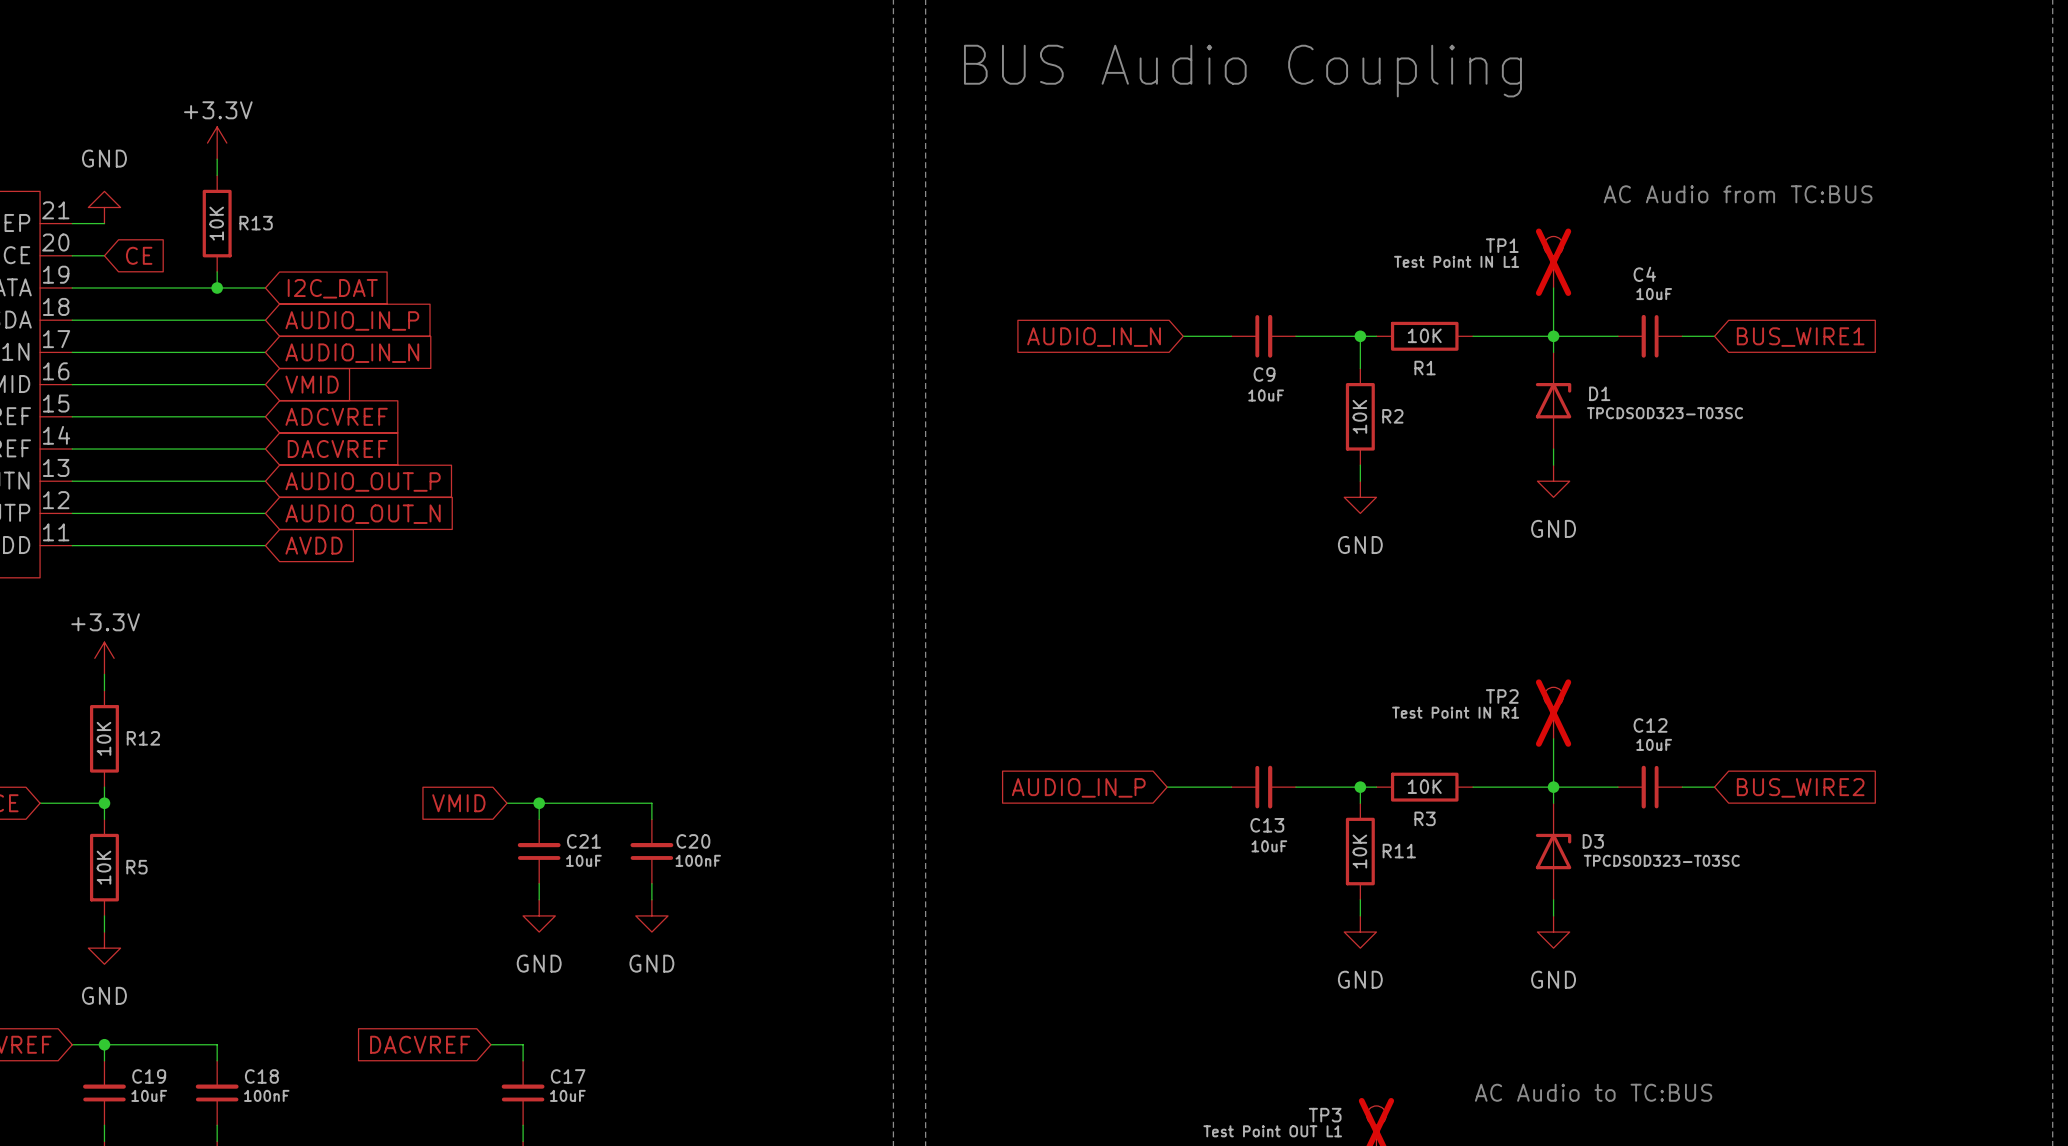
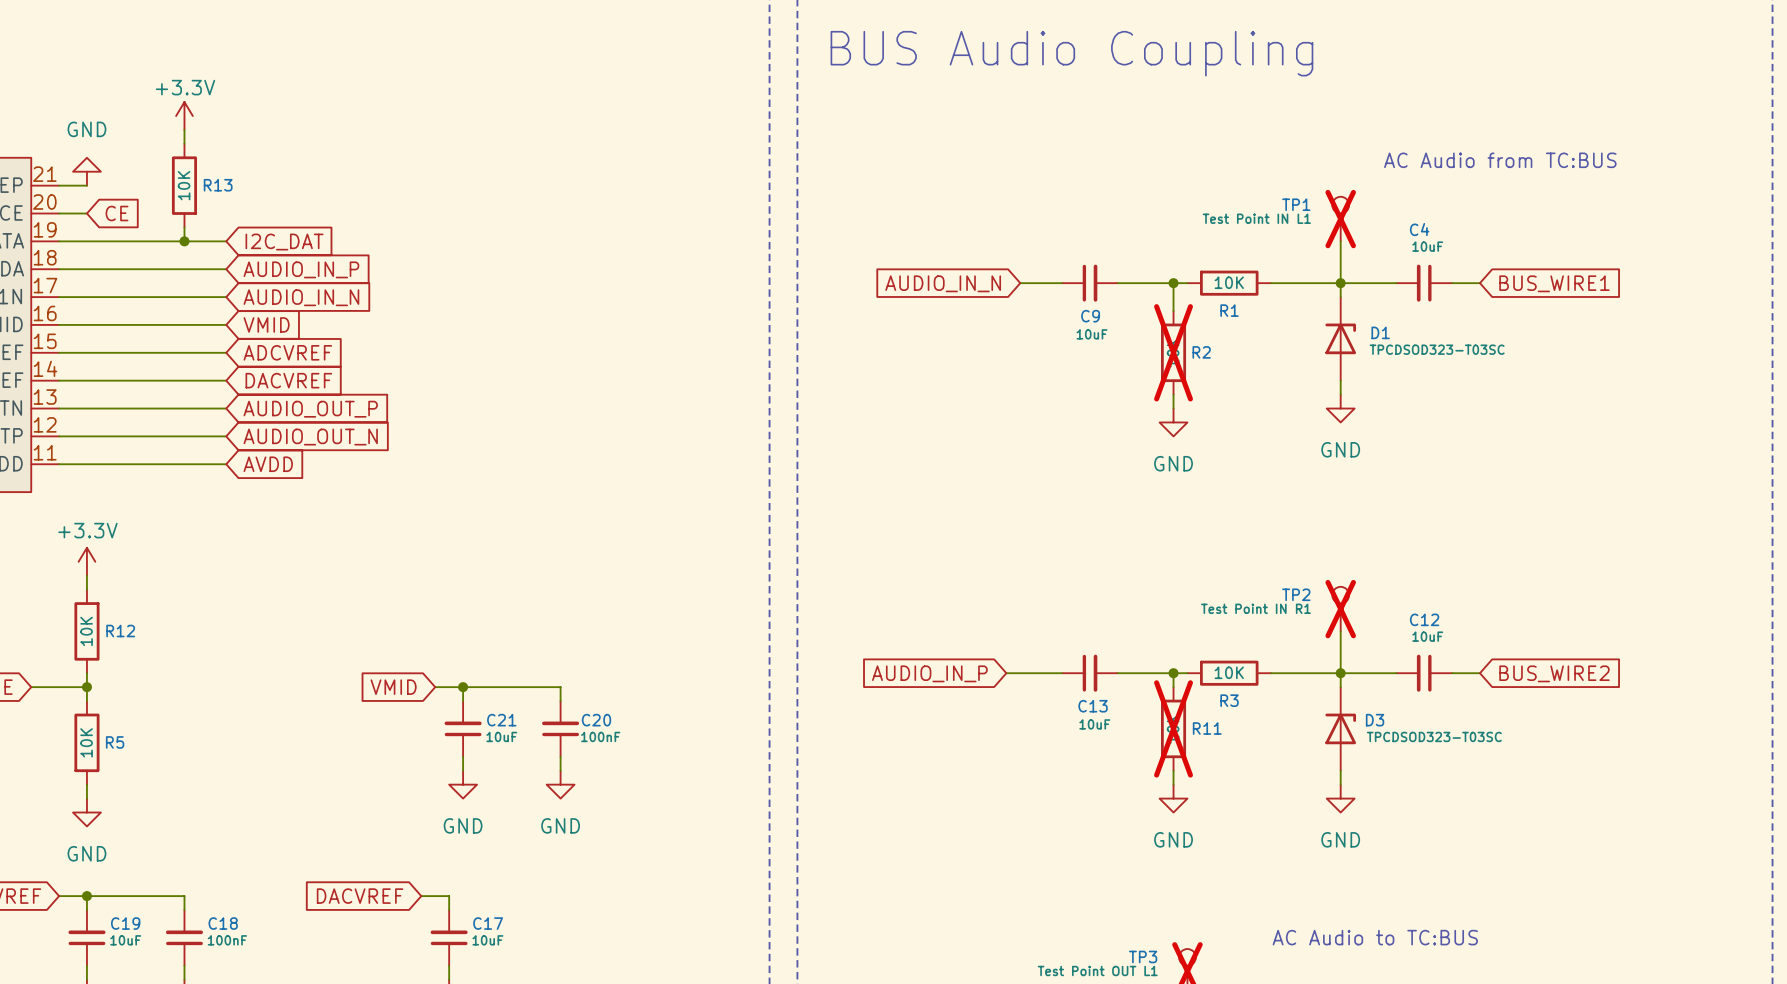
R2 do-not-place cross: none -> (1173, 352)
R11 do-not-place cross: none -> (1173, 728)

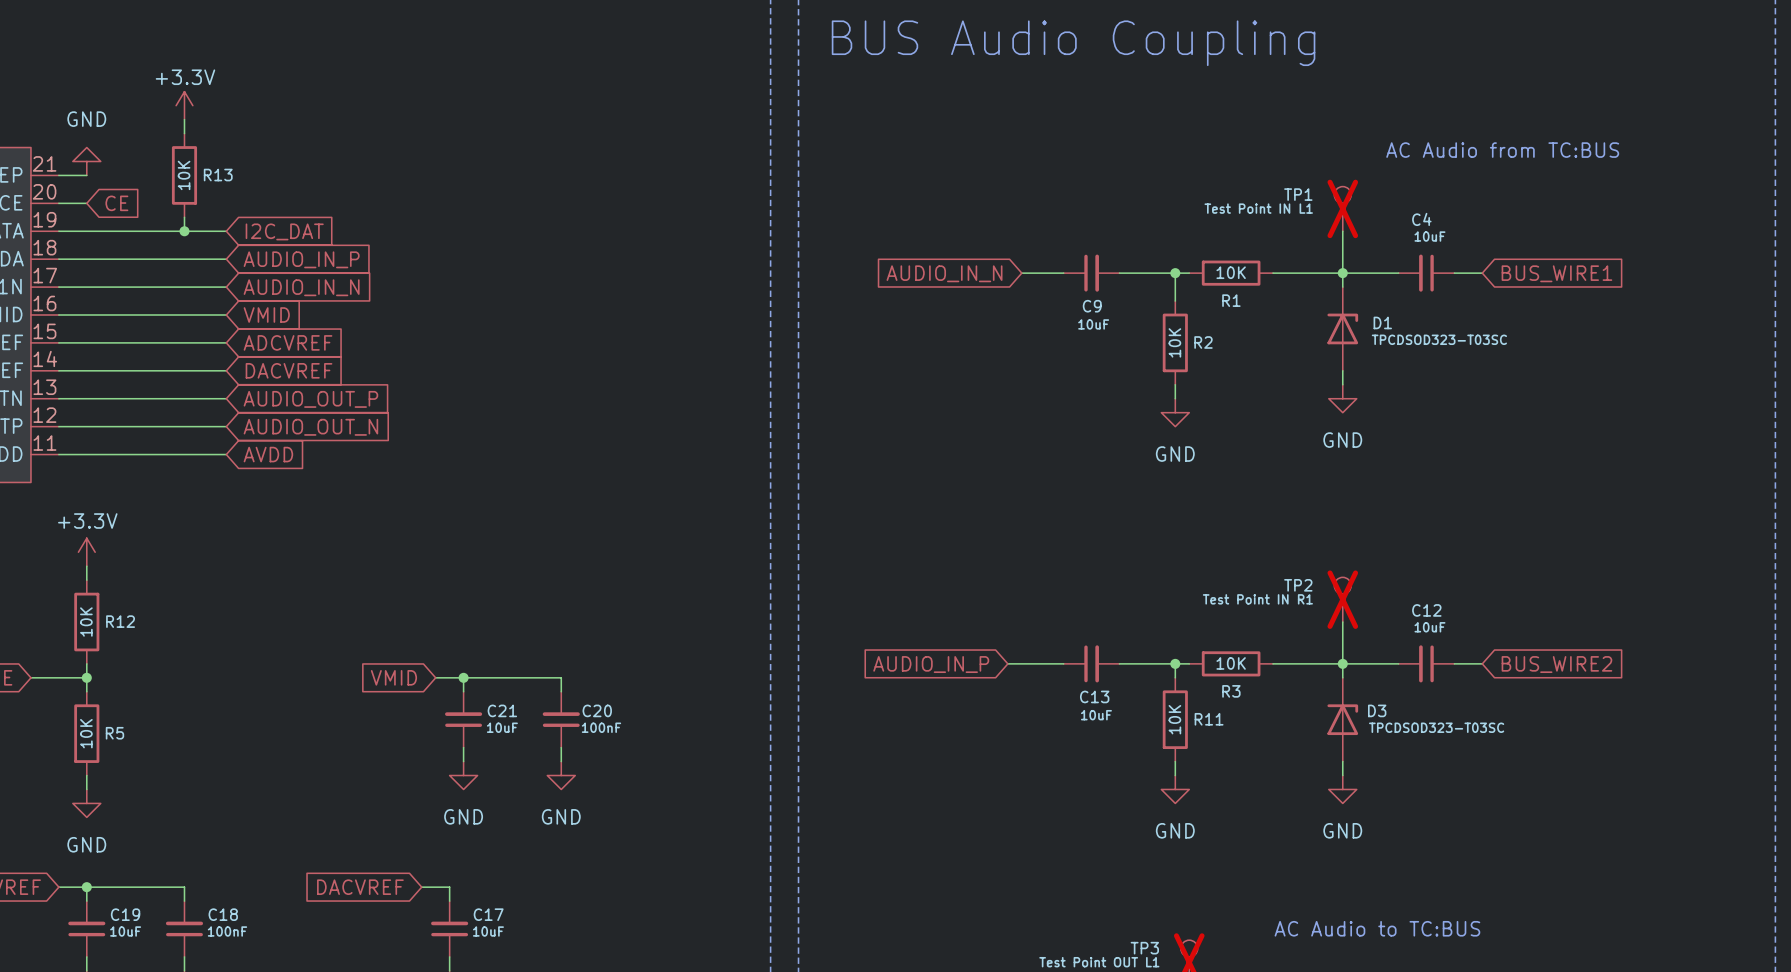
R2 do-not-place cross: (1173, 352) -> none
R11 do-not-place cross: (1173, 728) -> none

